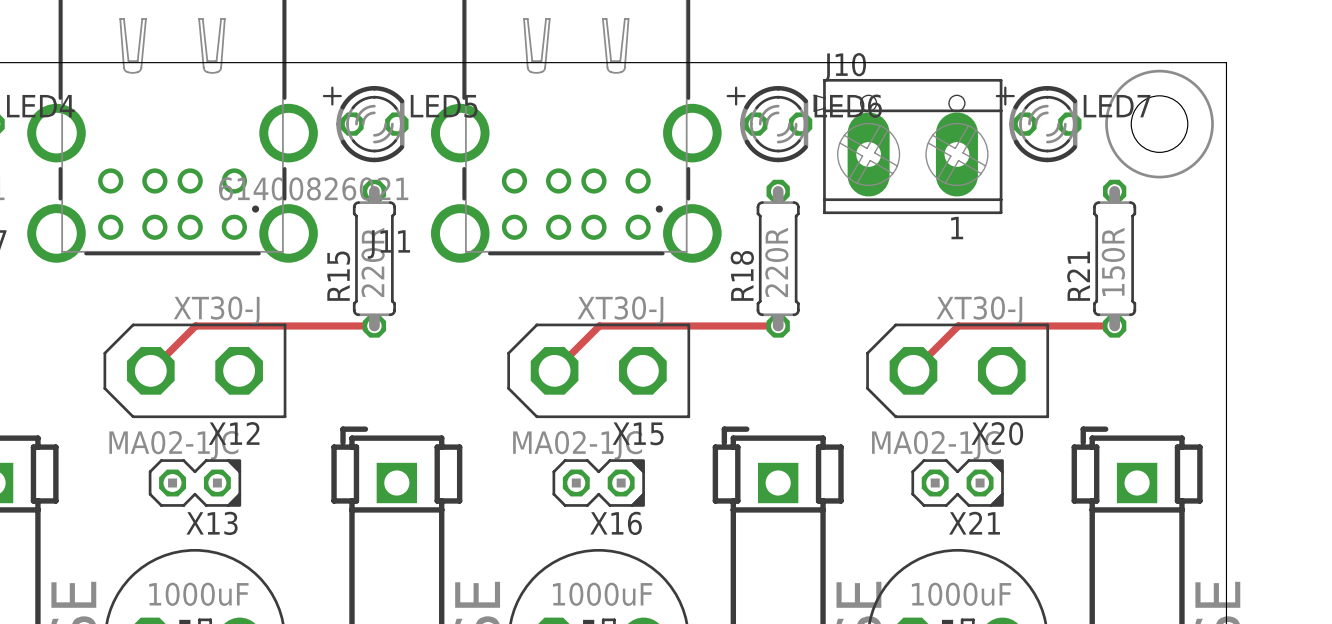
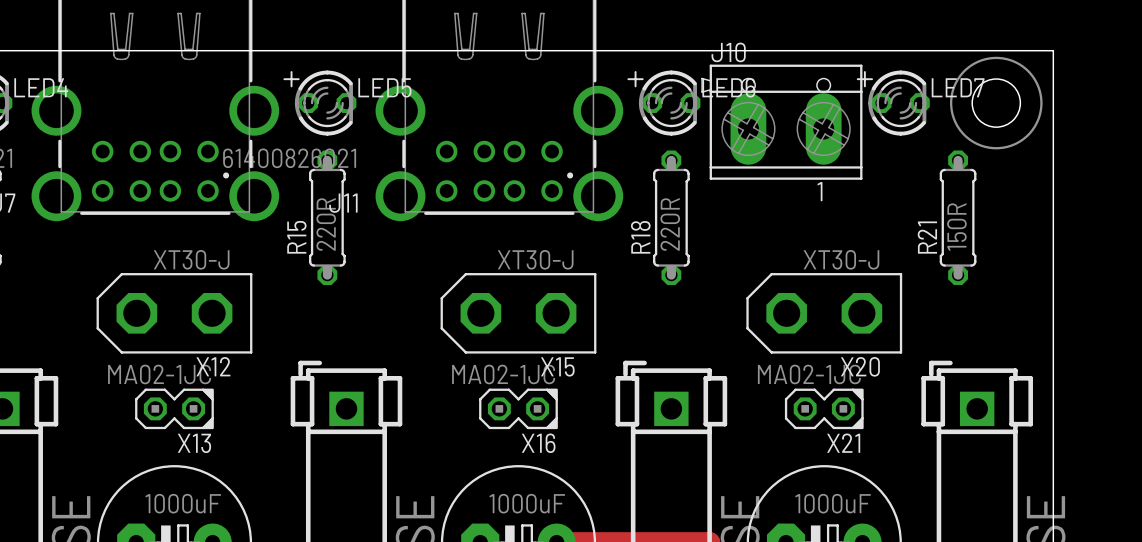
track: (374, 325) (195, 325) (150, 370) -> none
track: (778, 325) (599, 325) (554, 370) -> none
track: (1114, 325) (958, 325) (913, 370) -> none

